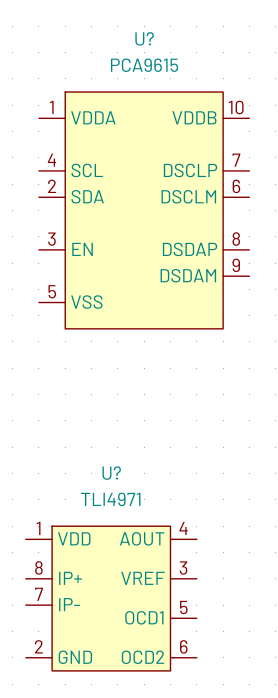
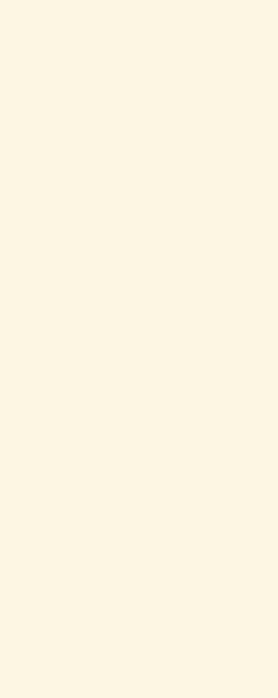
U?: PCA9615 (144, 210) -> none
U?: TLI4971 (111, 598) -> none

